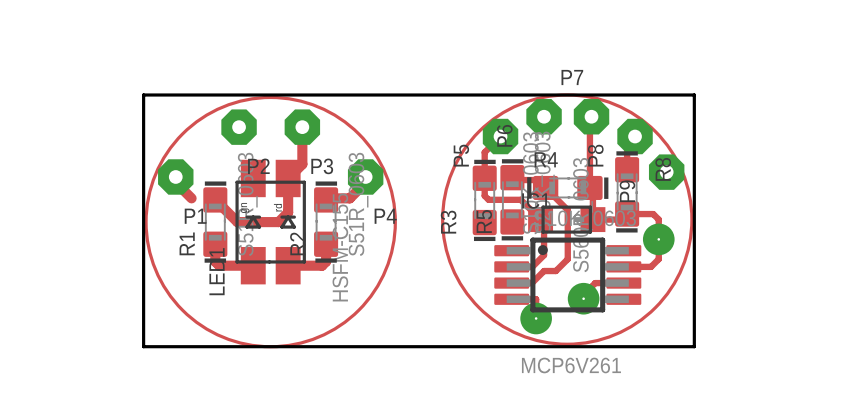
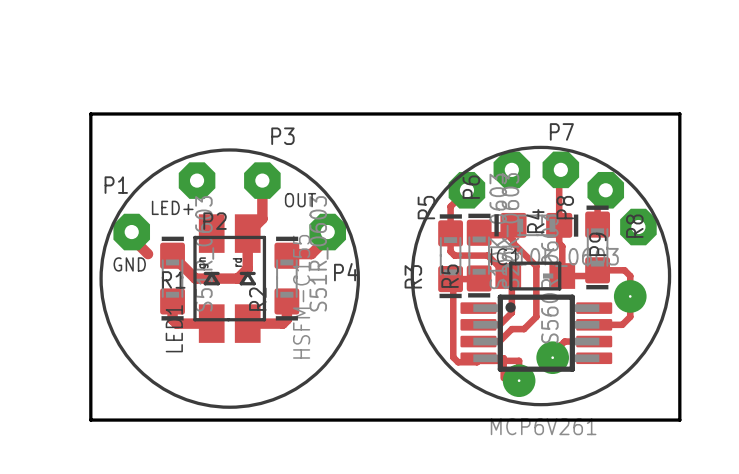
P7 name position: P7 (572, 77) -> P7 (561, 131)
drawing shape: [441, 93, 694, 346] -> [410, 145, 672, 407]
board edge: (143, 95) (694, 95) (694, 346) (143, 346) (143, 95) -> (90, 113) (90, 420) (679, 420) (679, 113) (90, 113)
drawing shape: [144, 95, 397, 349] -> [99, 148, 360, 409]
text: none -> OUT (300, 200)
text: none -> LED+ (172, 207)
R4 name rotation: 0° (546, 159) -> 90° counterclockwise (535, 221)
P3 name position: P3 (322, 166) -> P3 (282, 136)
R4 position: (567, 187) -> (536, 225)
text: none -> GND (129, 264)
P1 name position: P1 (195, 216) -> P1 (116, 185)
track: none -> (474, 278) (442, 279) (453, 289) (453, 357) (458, 362) (519, 360) (519, 380)
R1 name rotation: 0° (187, 243) -> 90° clockwise (173, 279)
via position: (536, 318) -> (519, 380)

